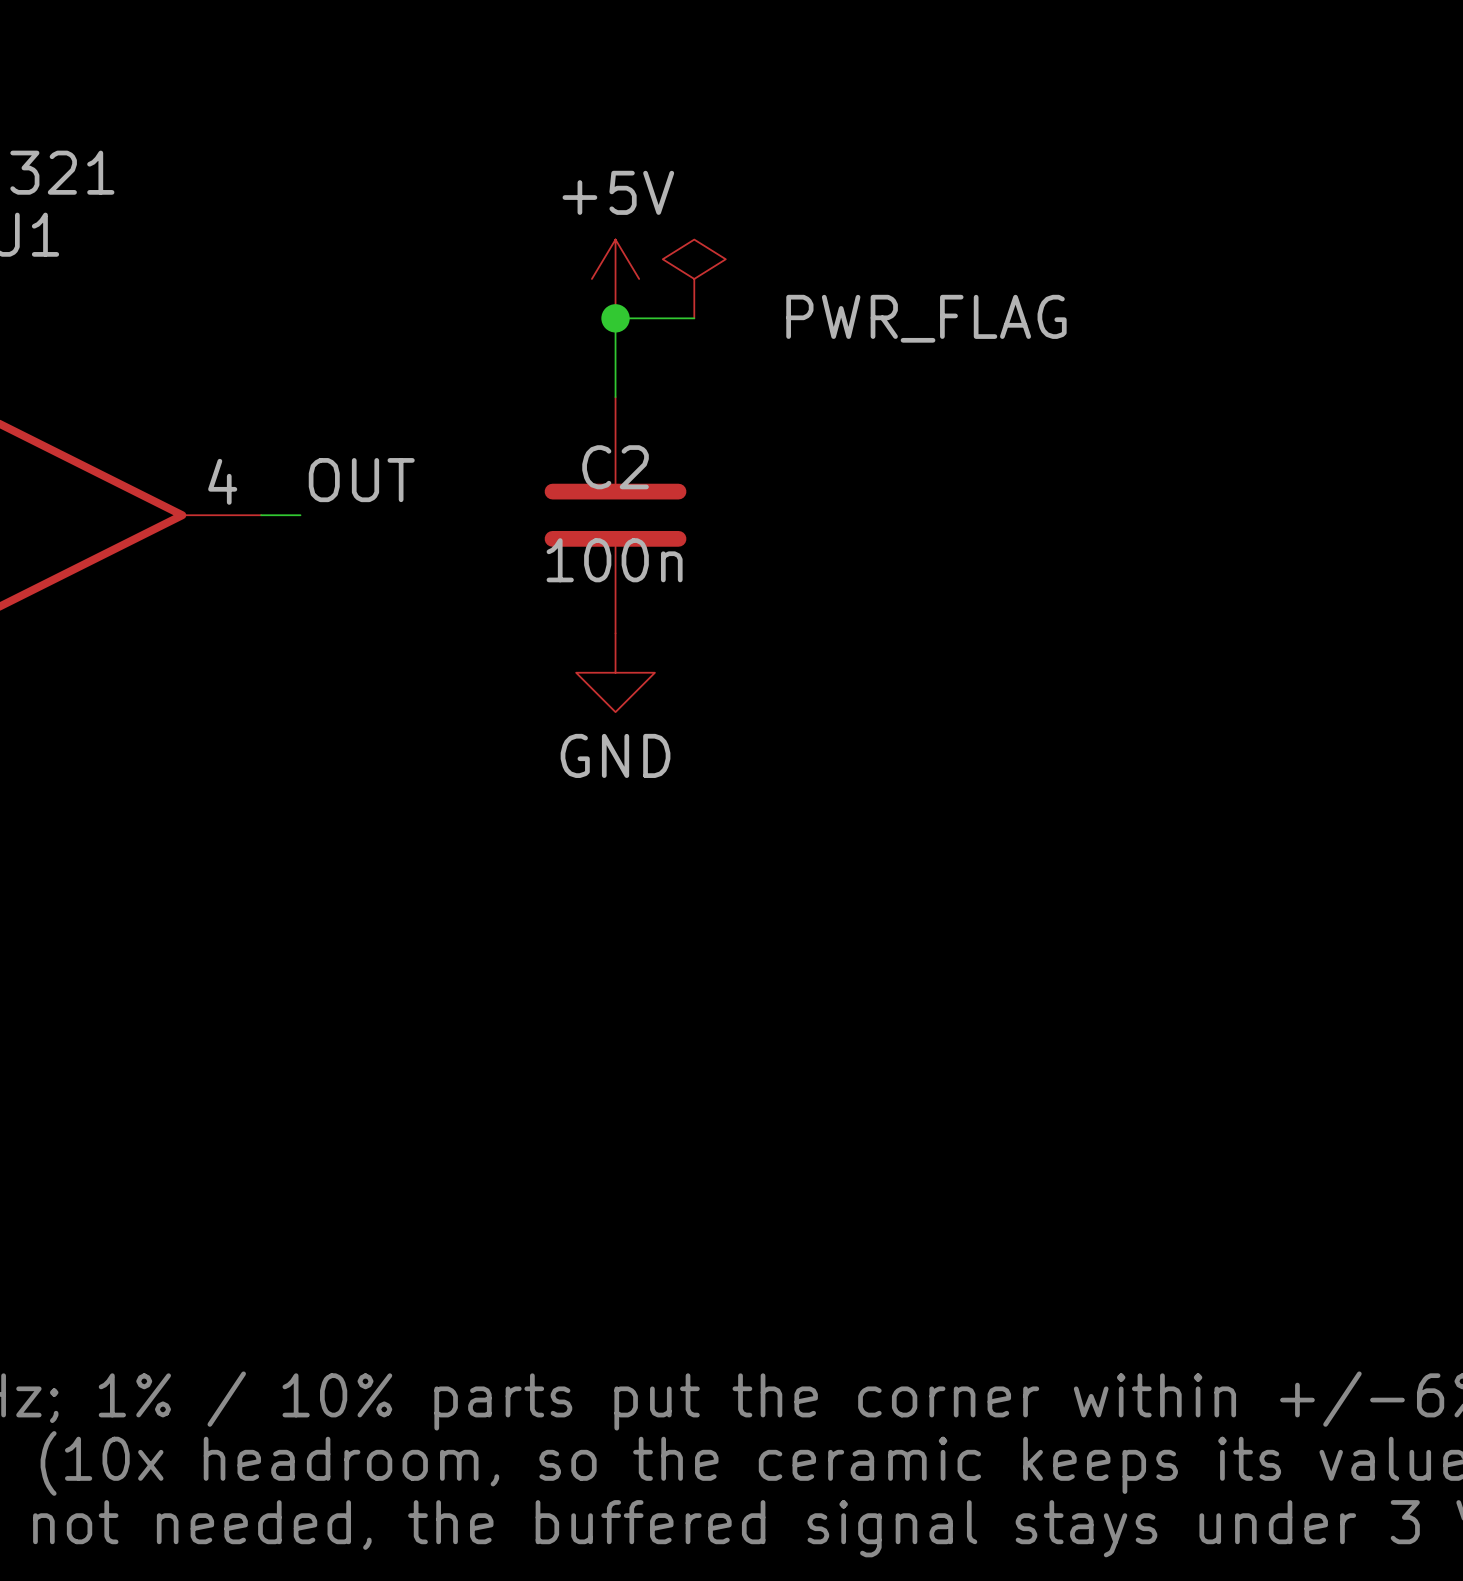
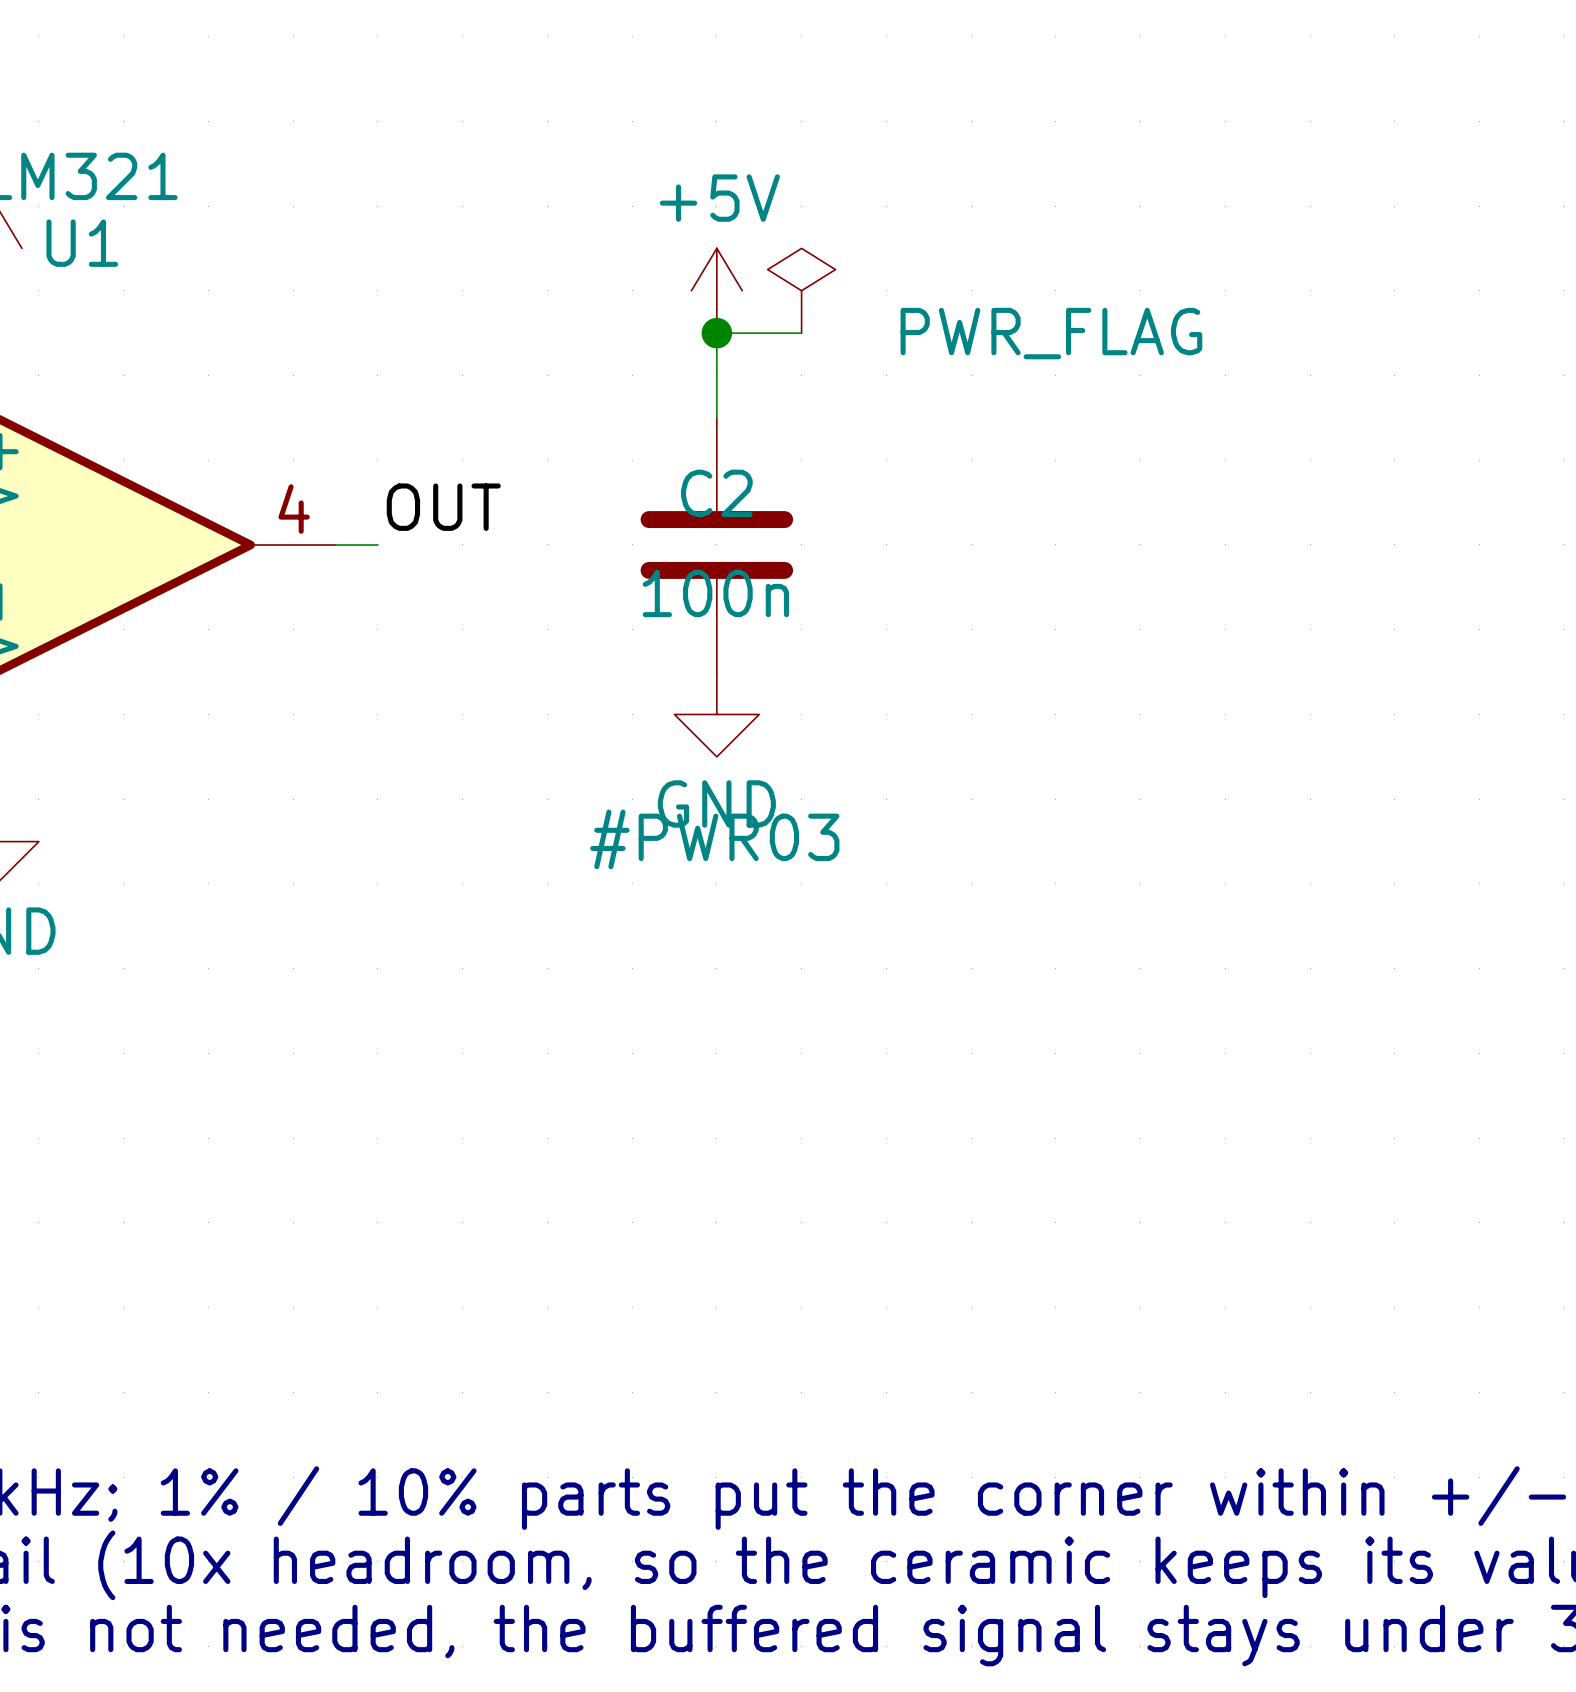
#PWR03 name: none -> #PWR03 (714, 839)

